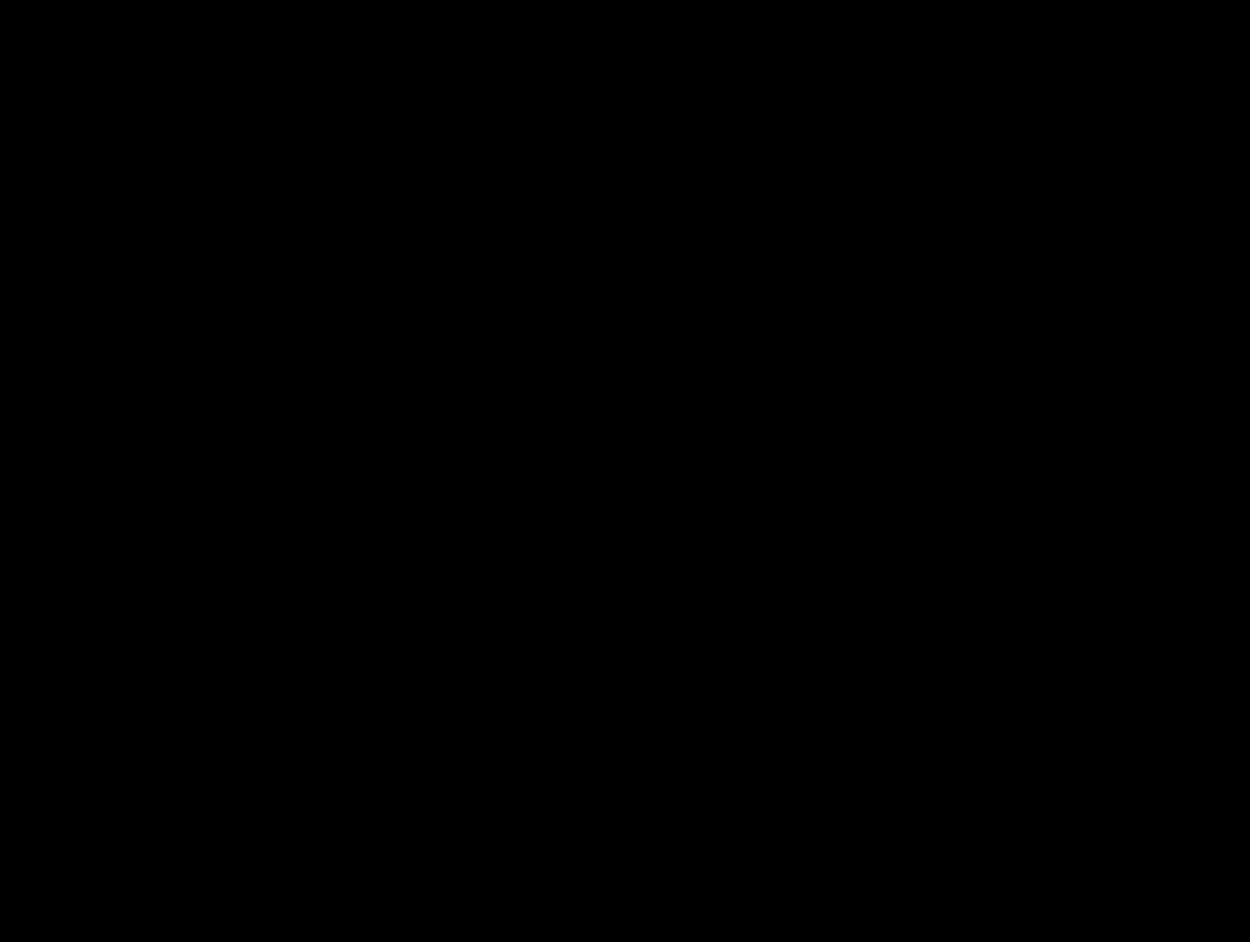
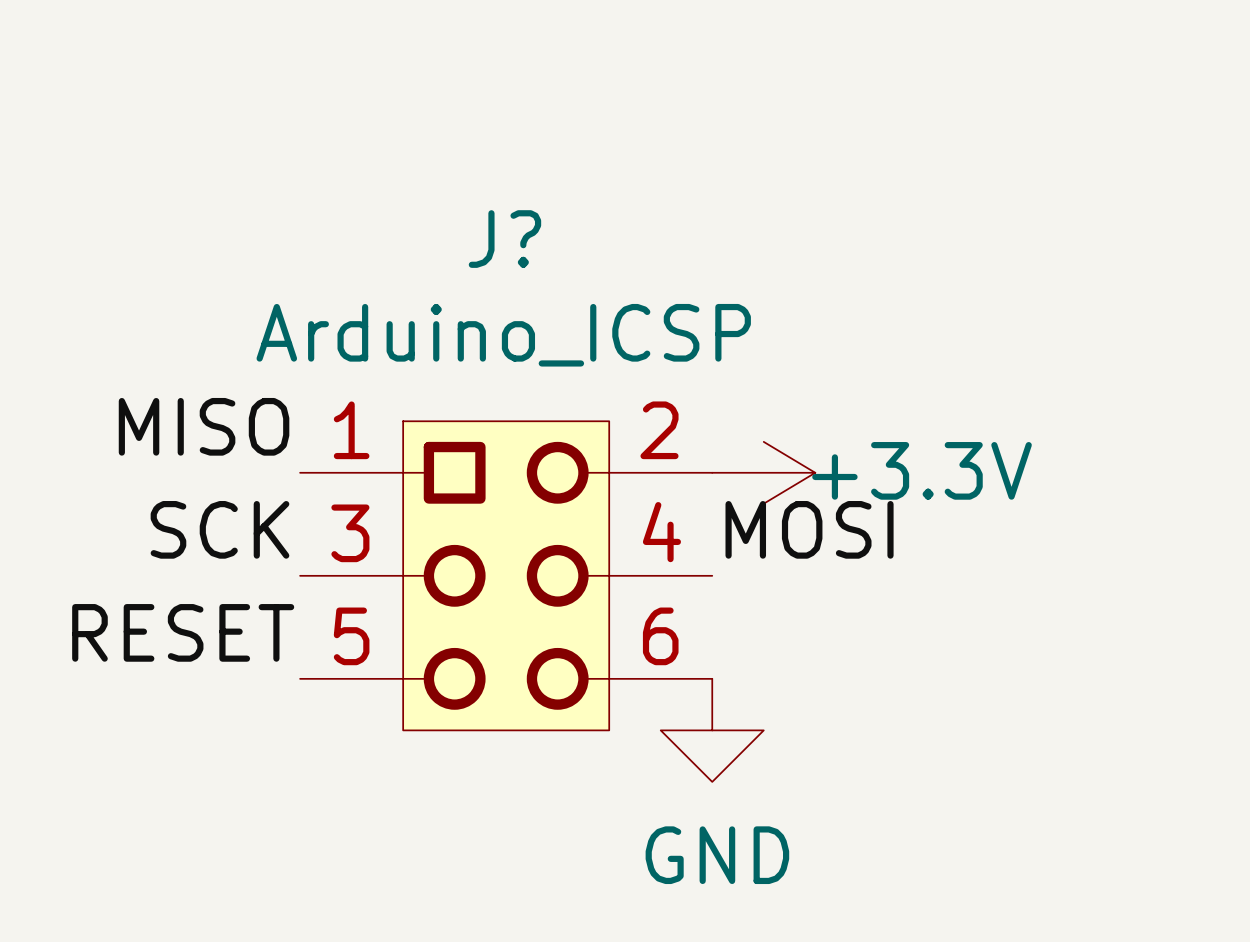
label: none -> MISO (204, 426)
power symbol: none -> +3.3V (763, 472)
label: none -> SCK (219, 529)
label: none -> MOSI (809, 529)
J?: none -> Arduino_ICSP (506, 575)
label: none -> RESET (183, 632)
power symbol: none -> GND (712, 730)

